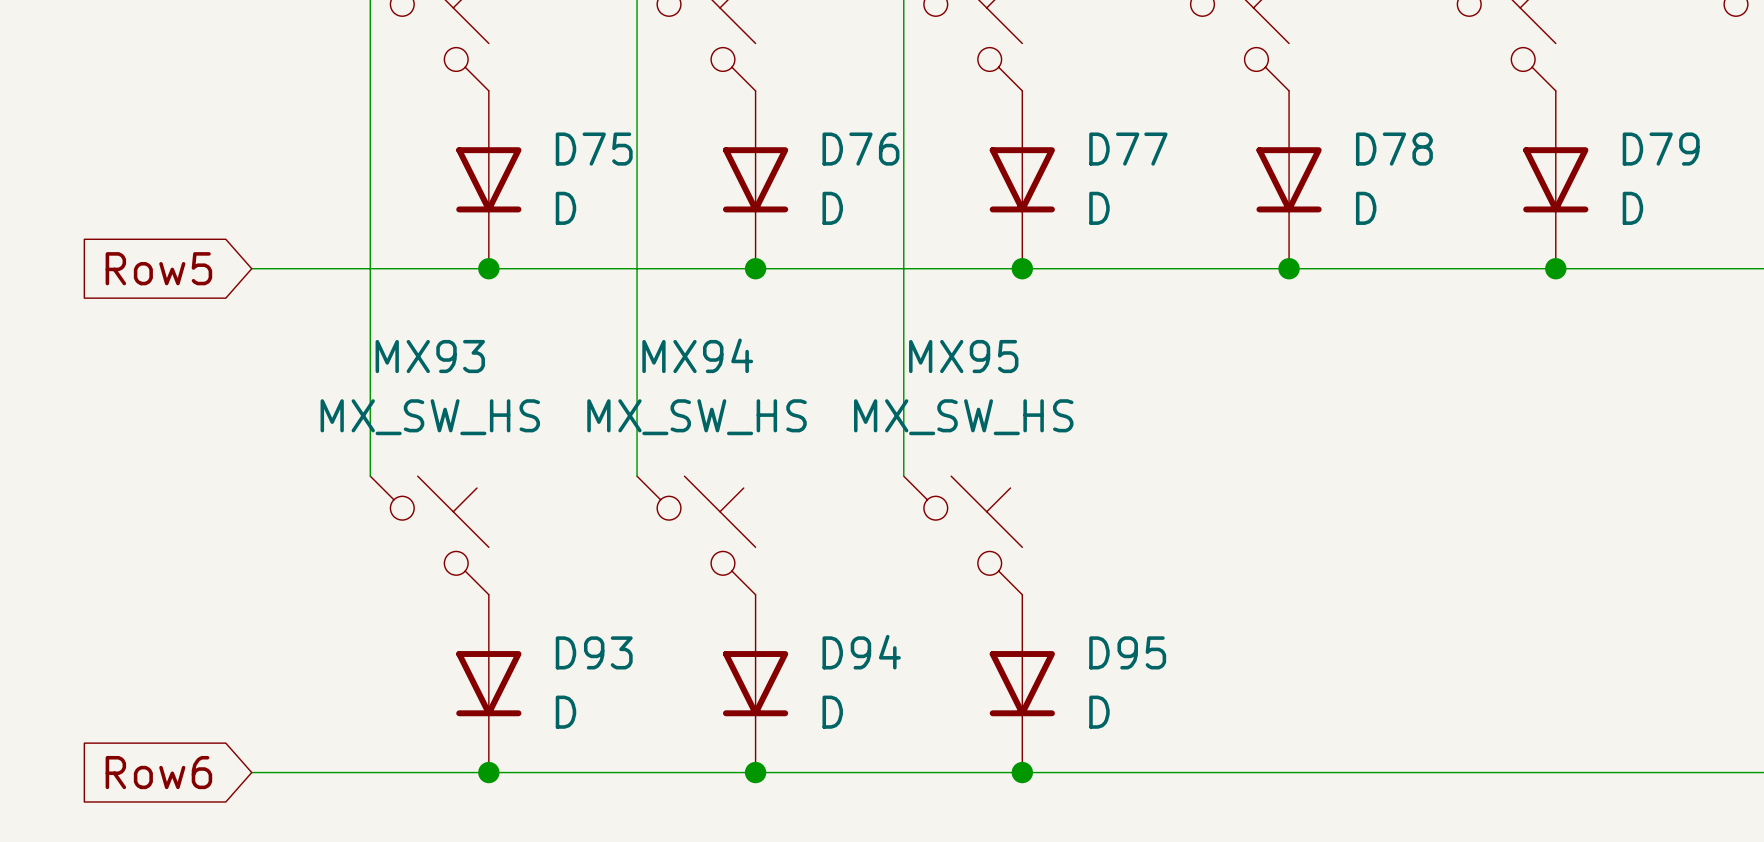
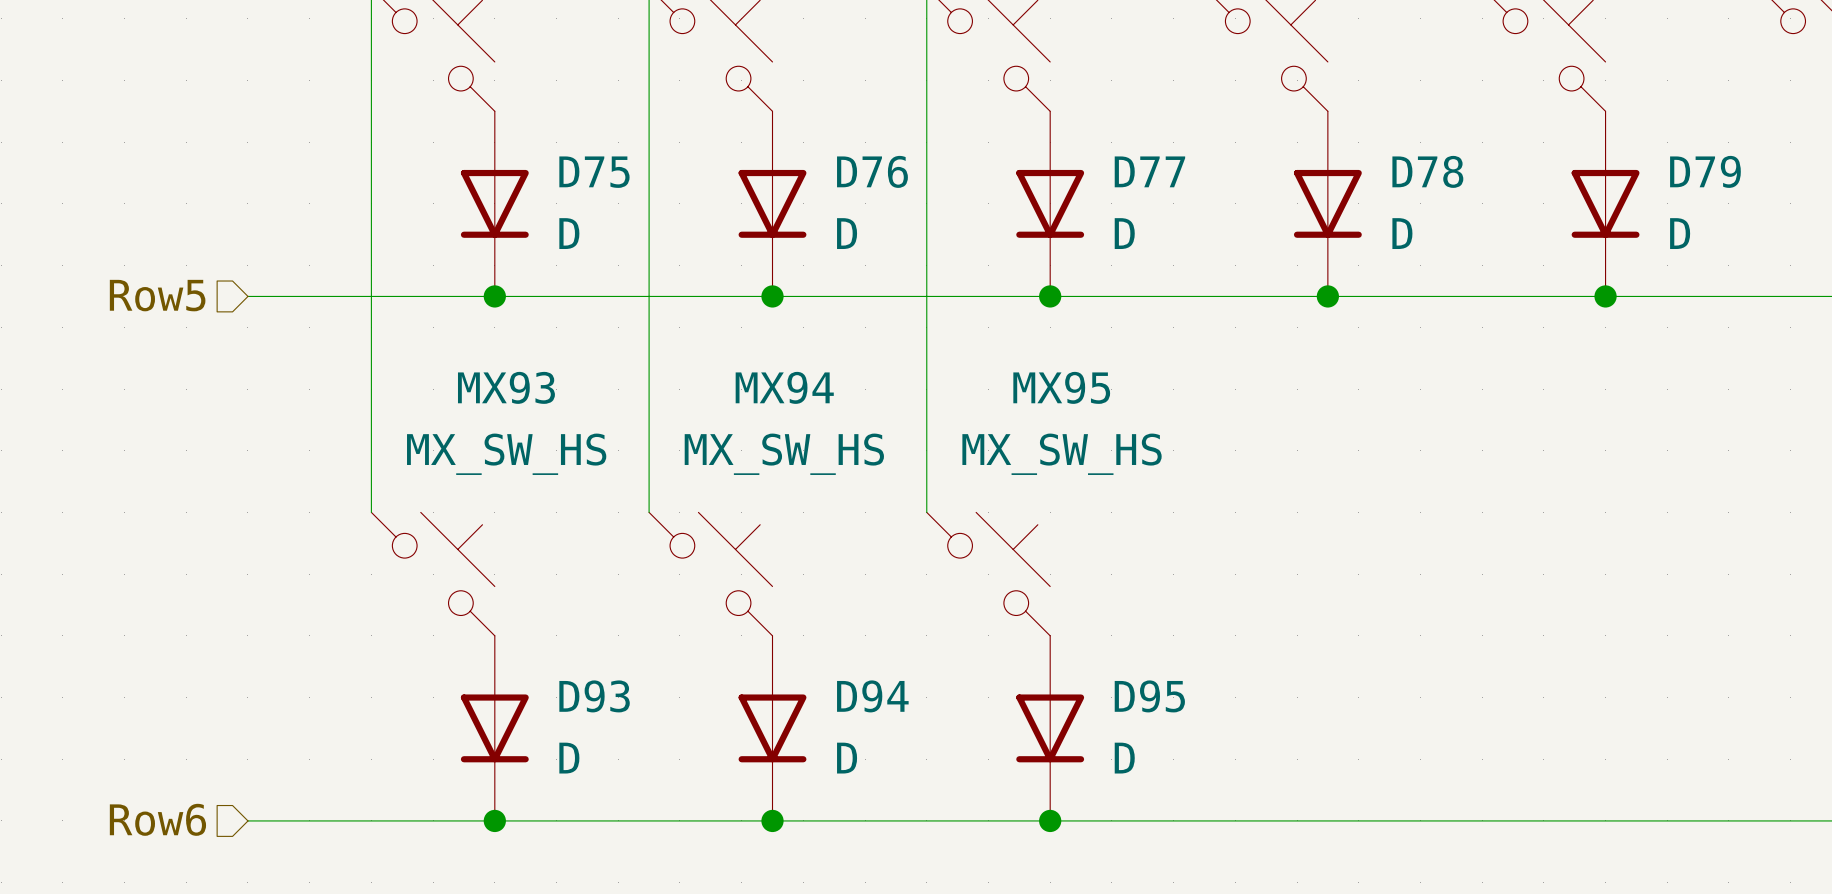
hierarchical label: none -> Row5 (157, 295)
global label: Row5 (158, 268) -> none
MX94 name position: MX94 (697, 355) -> MX94 (784, 387)
MX93 name position: MX93 (430, 356) -> MX93 (506, 387)
MX95 name position: MX95 (963, 356) -> MX95 (1061, 387)
MX93 value position: MX_SW_HS (430, 417) -> MX_SW_HS (506, 454)
MX94 value position: MX_SW_HS (697, 417) -> MX_SW_HS (784, 454)
MX95 value position: MX_SW_HS (963, 417) -> MX_SW_HS (1062, 454)
hierarchical label: none -> Row6 (157, 819)
global label: Row6 (158, 772) -> none

